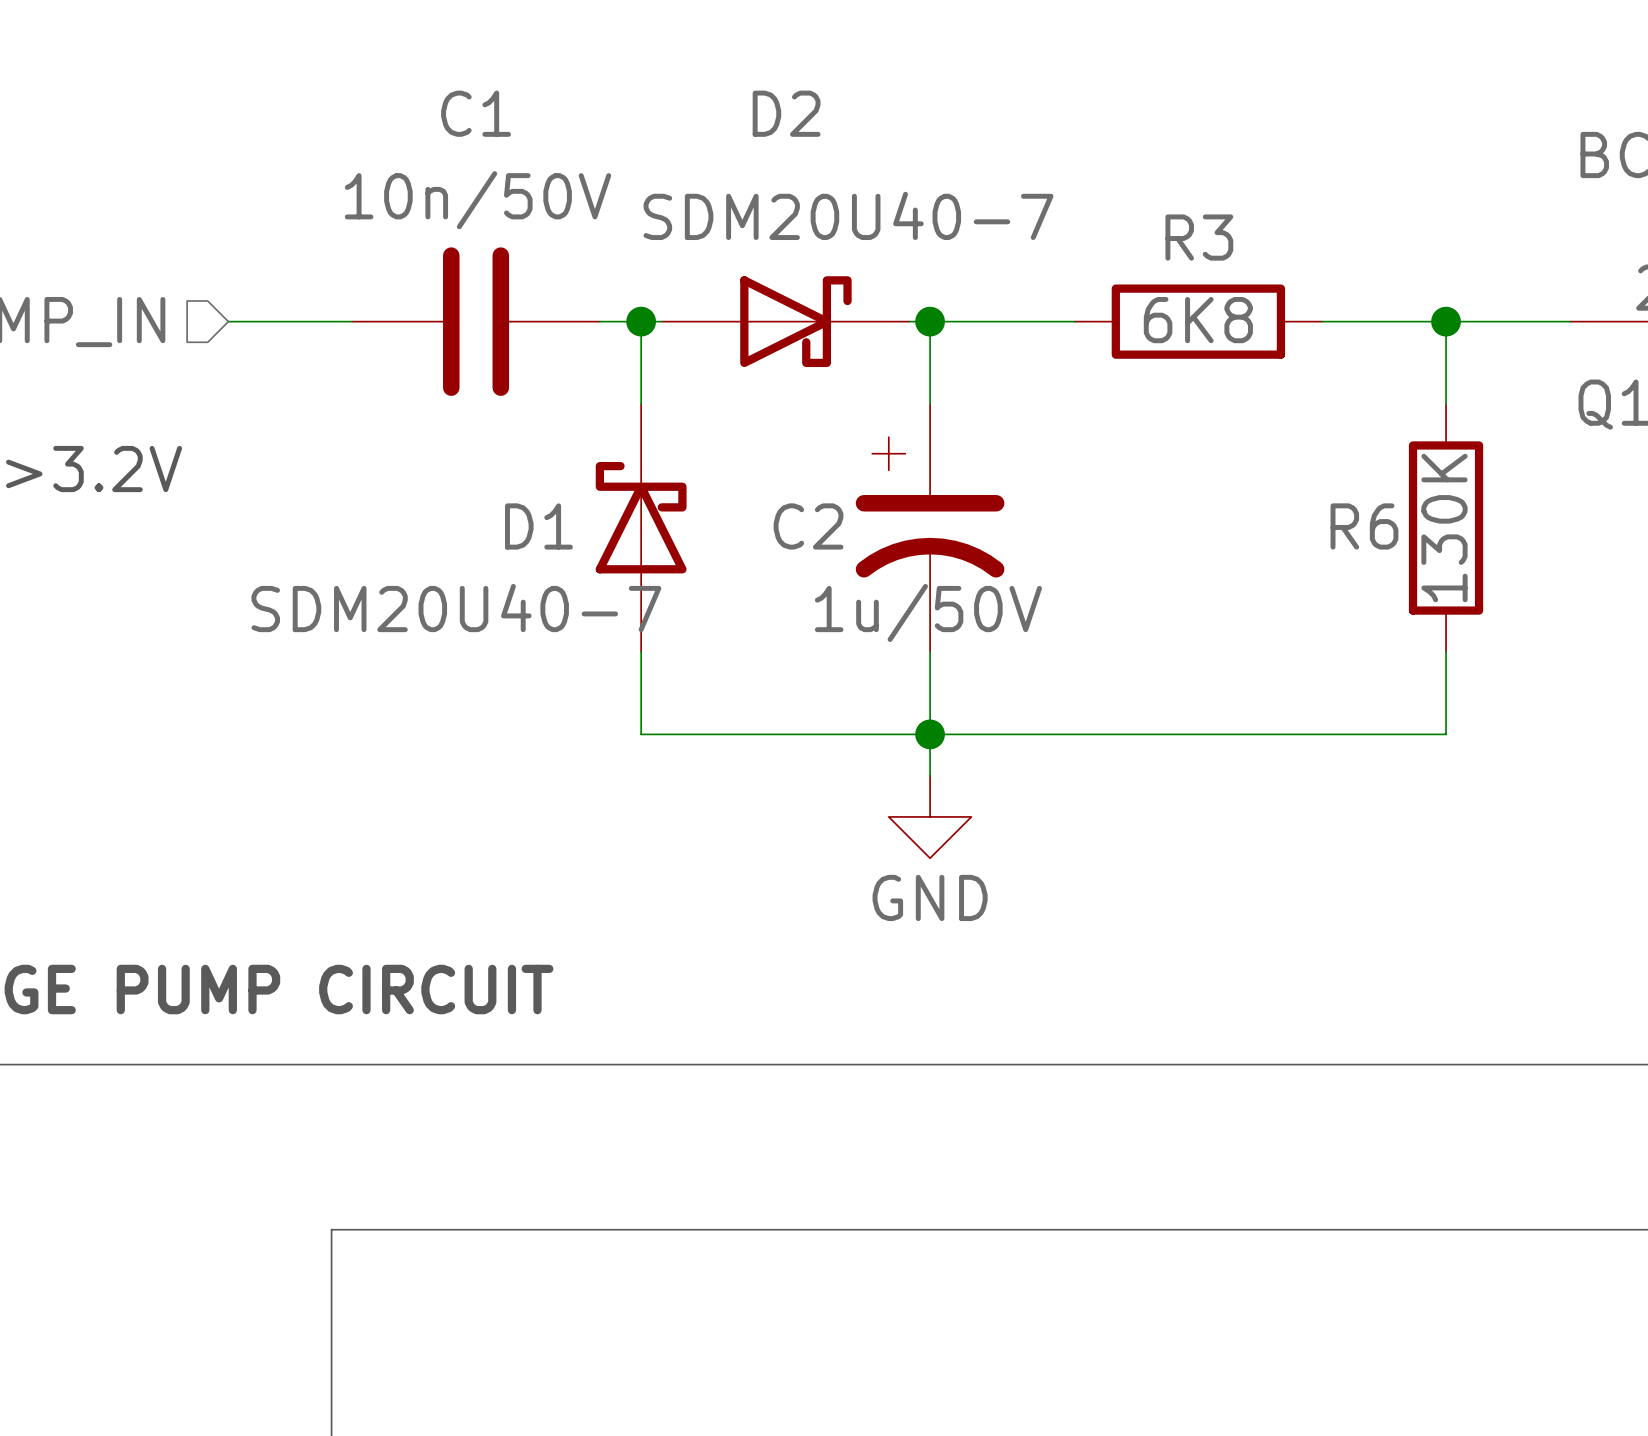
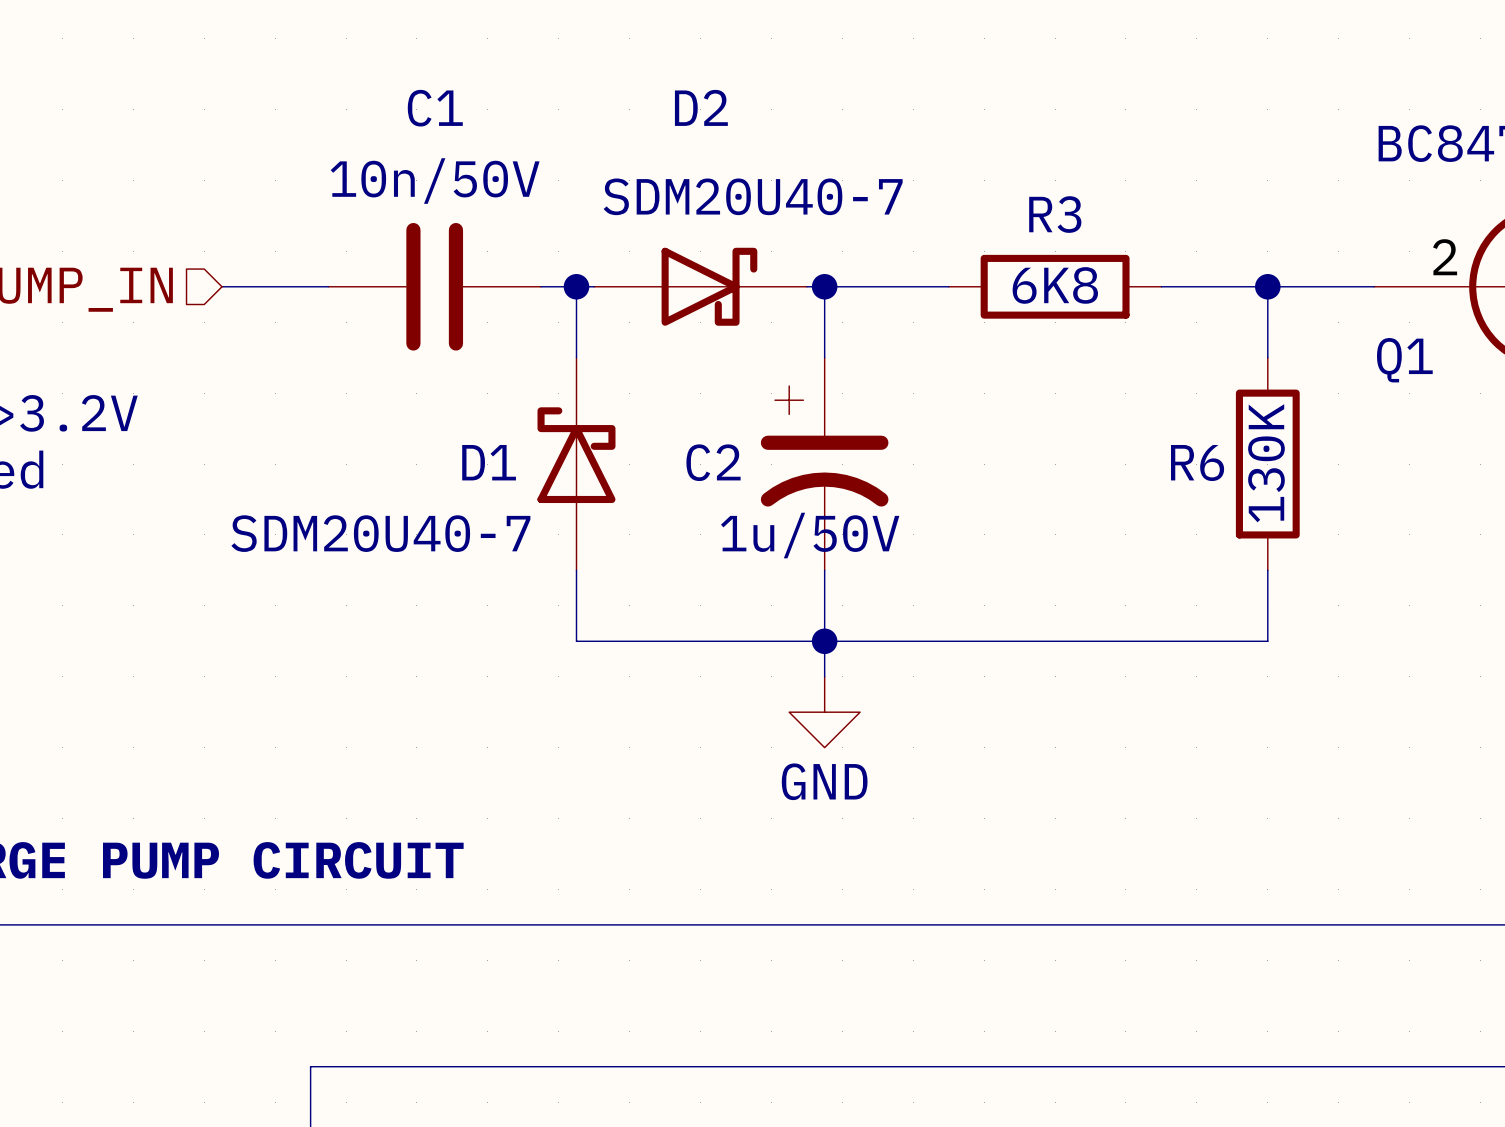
D1 value position: SDM20U40-7 (456, 608) -> SDM20U40-7 (380, 533)

